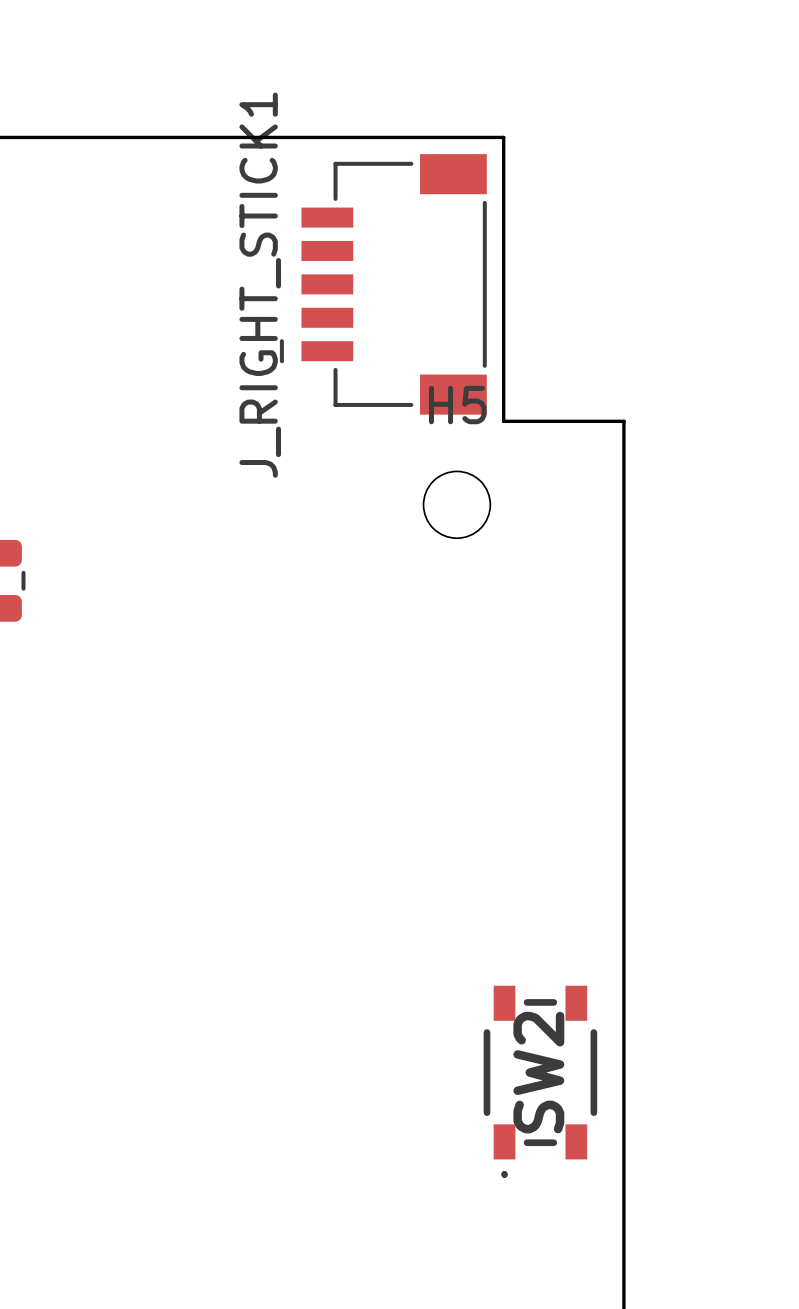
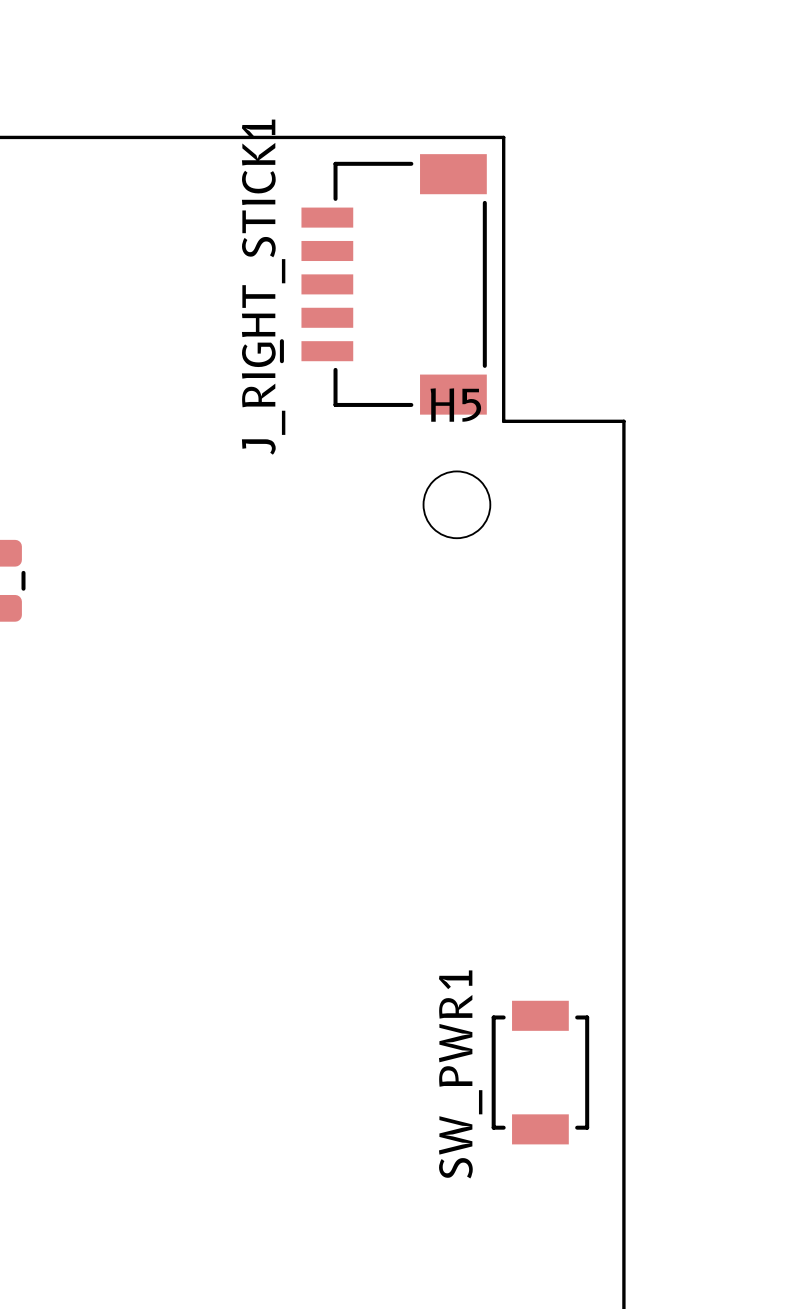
SW_PWR1: none -> (540, 1072)
SW2: (540, 1081) -> none

